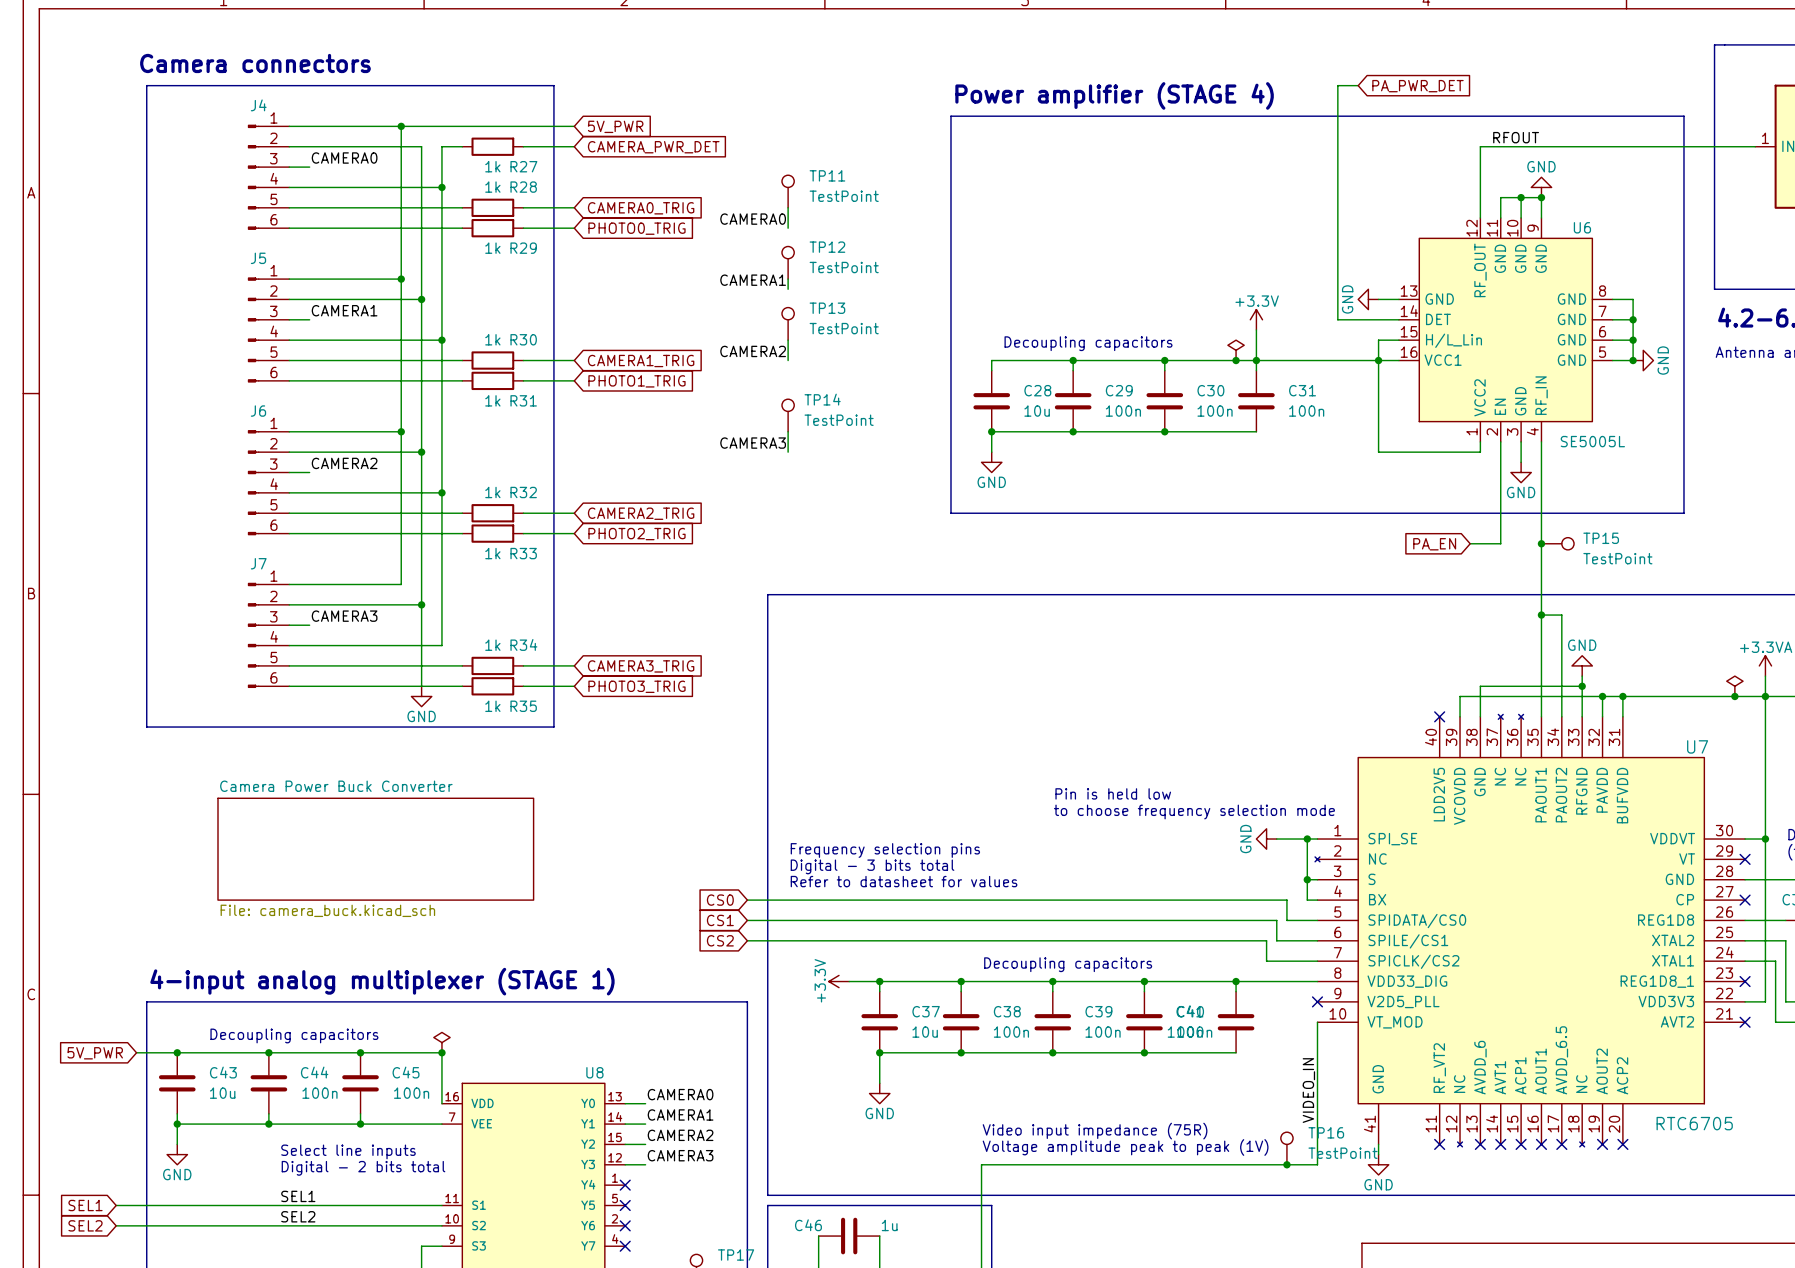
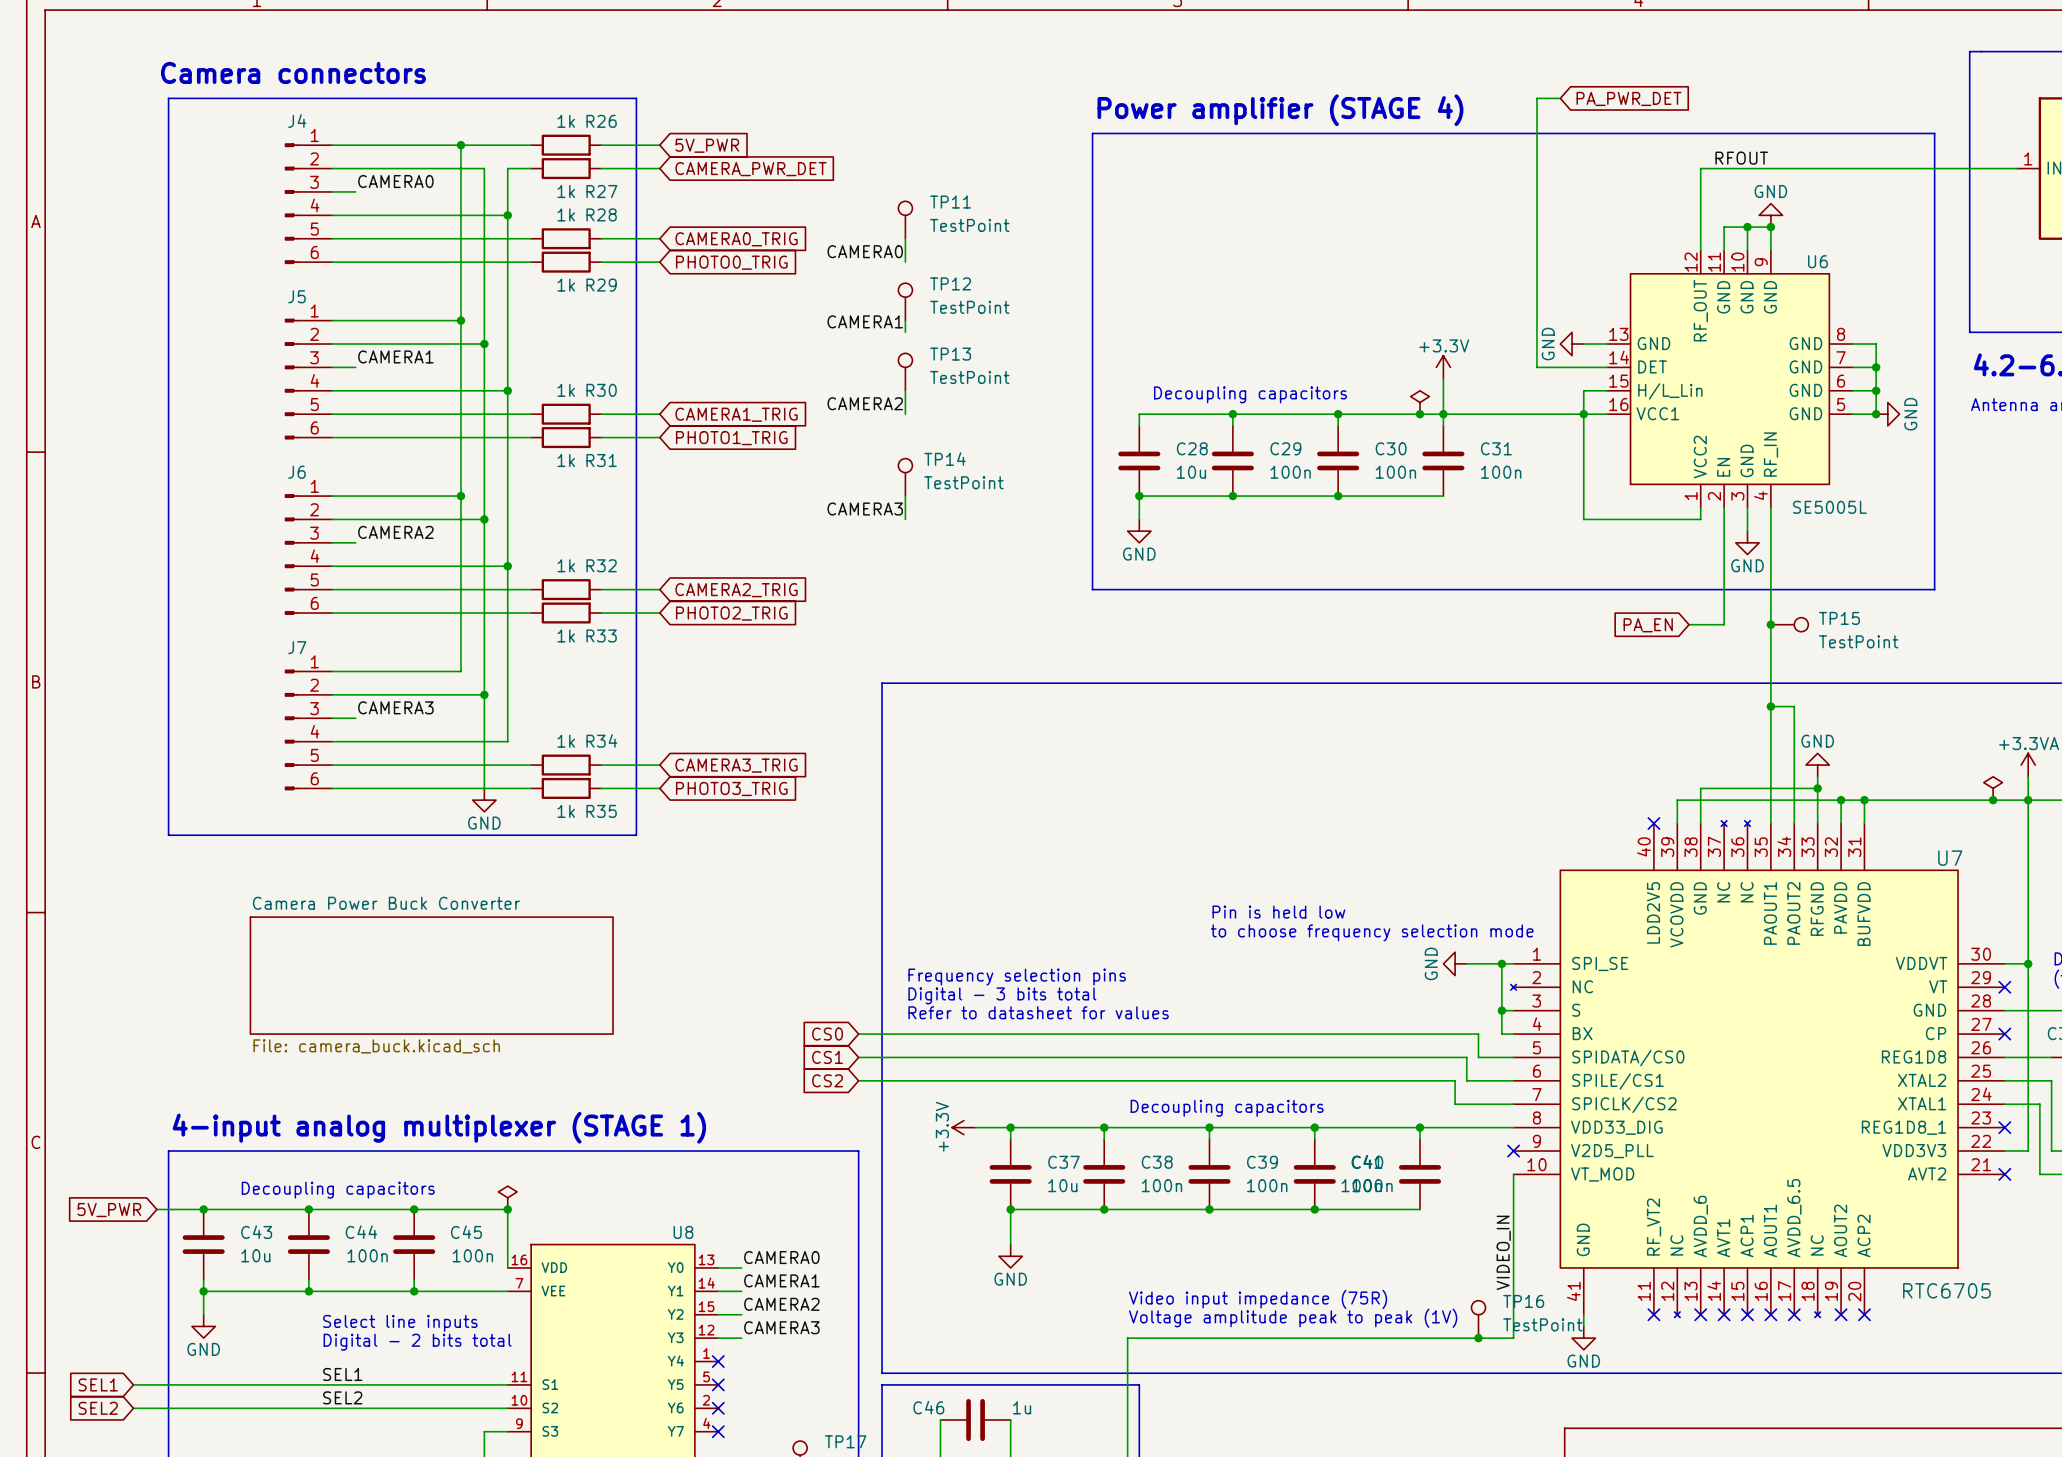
wire: (462, 126) (523, 126) -> none
R26: none -> 1k (566, 145)

